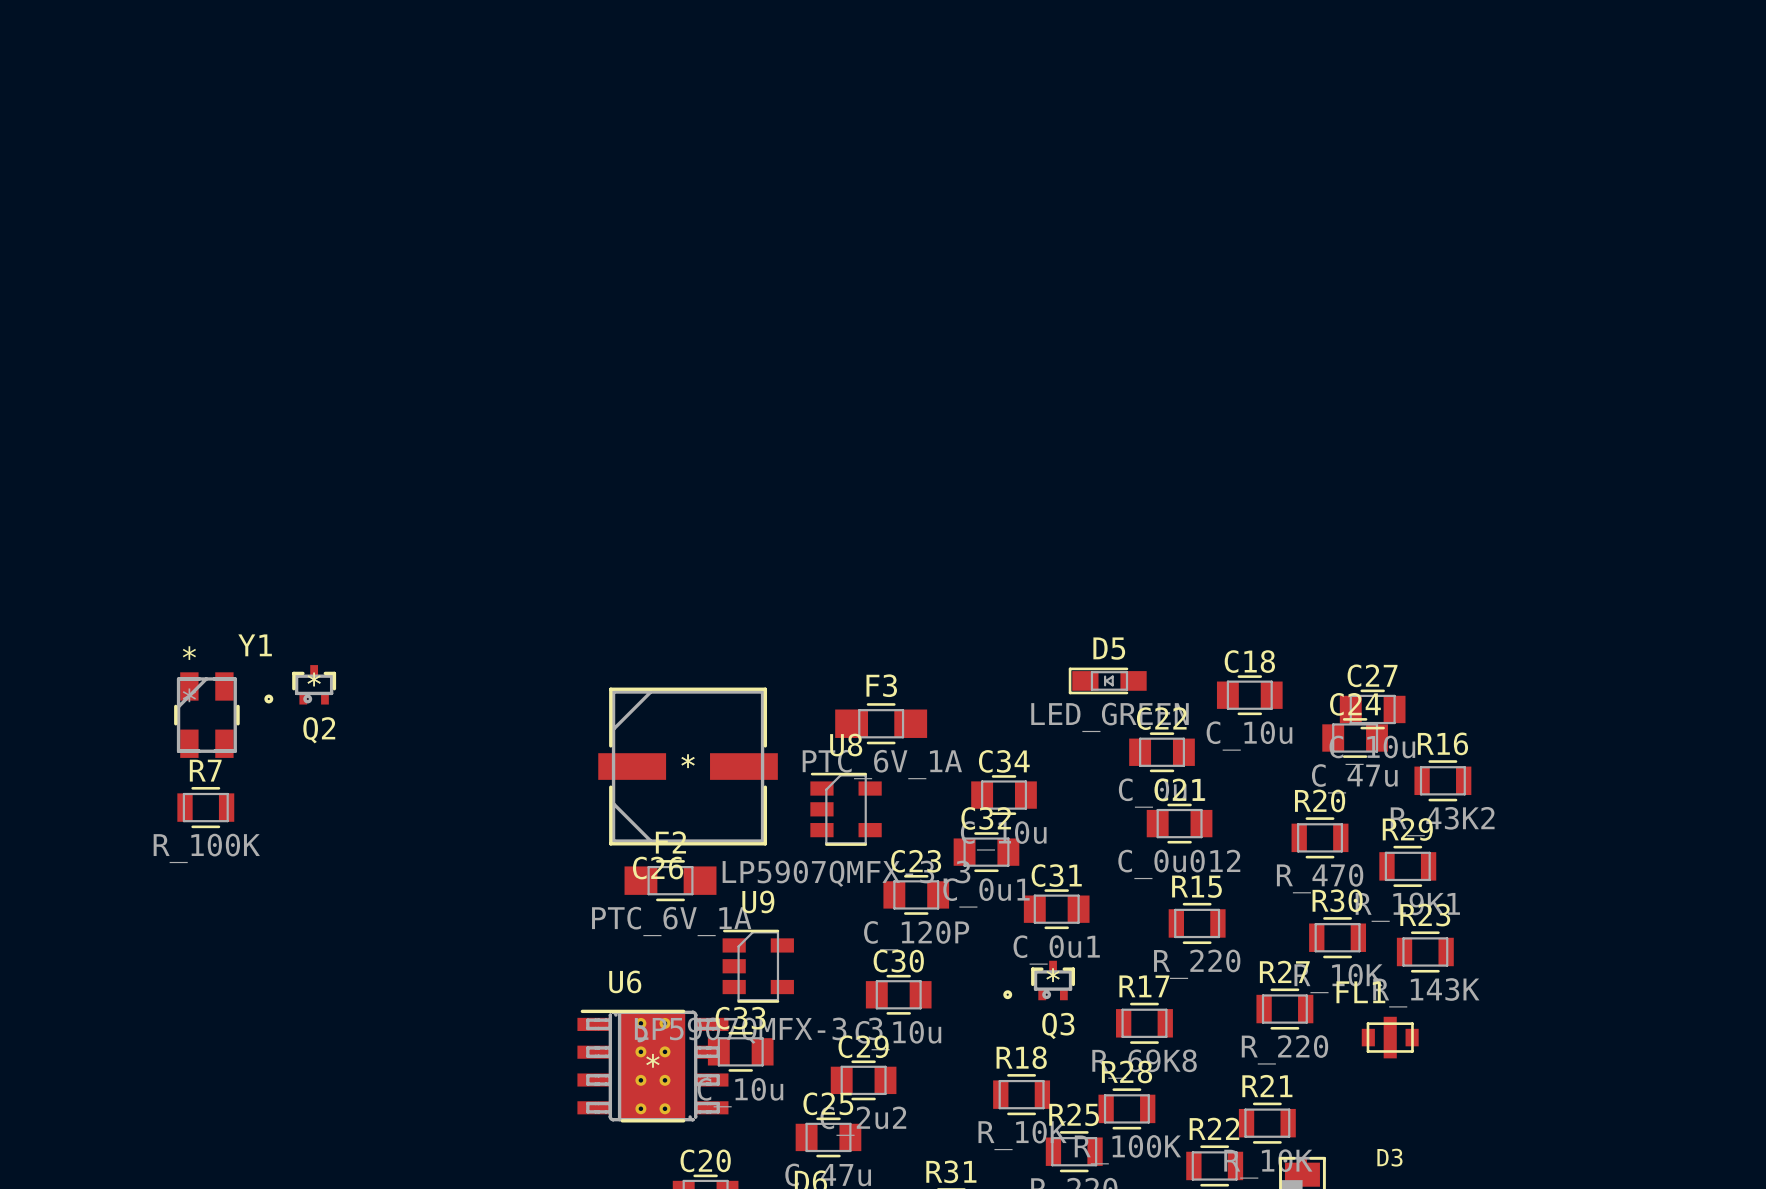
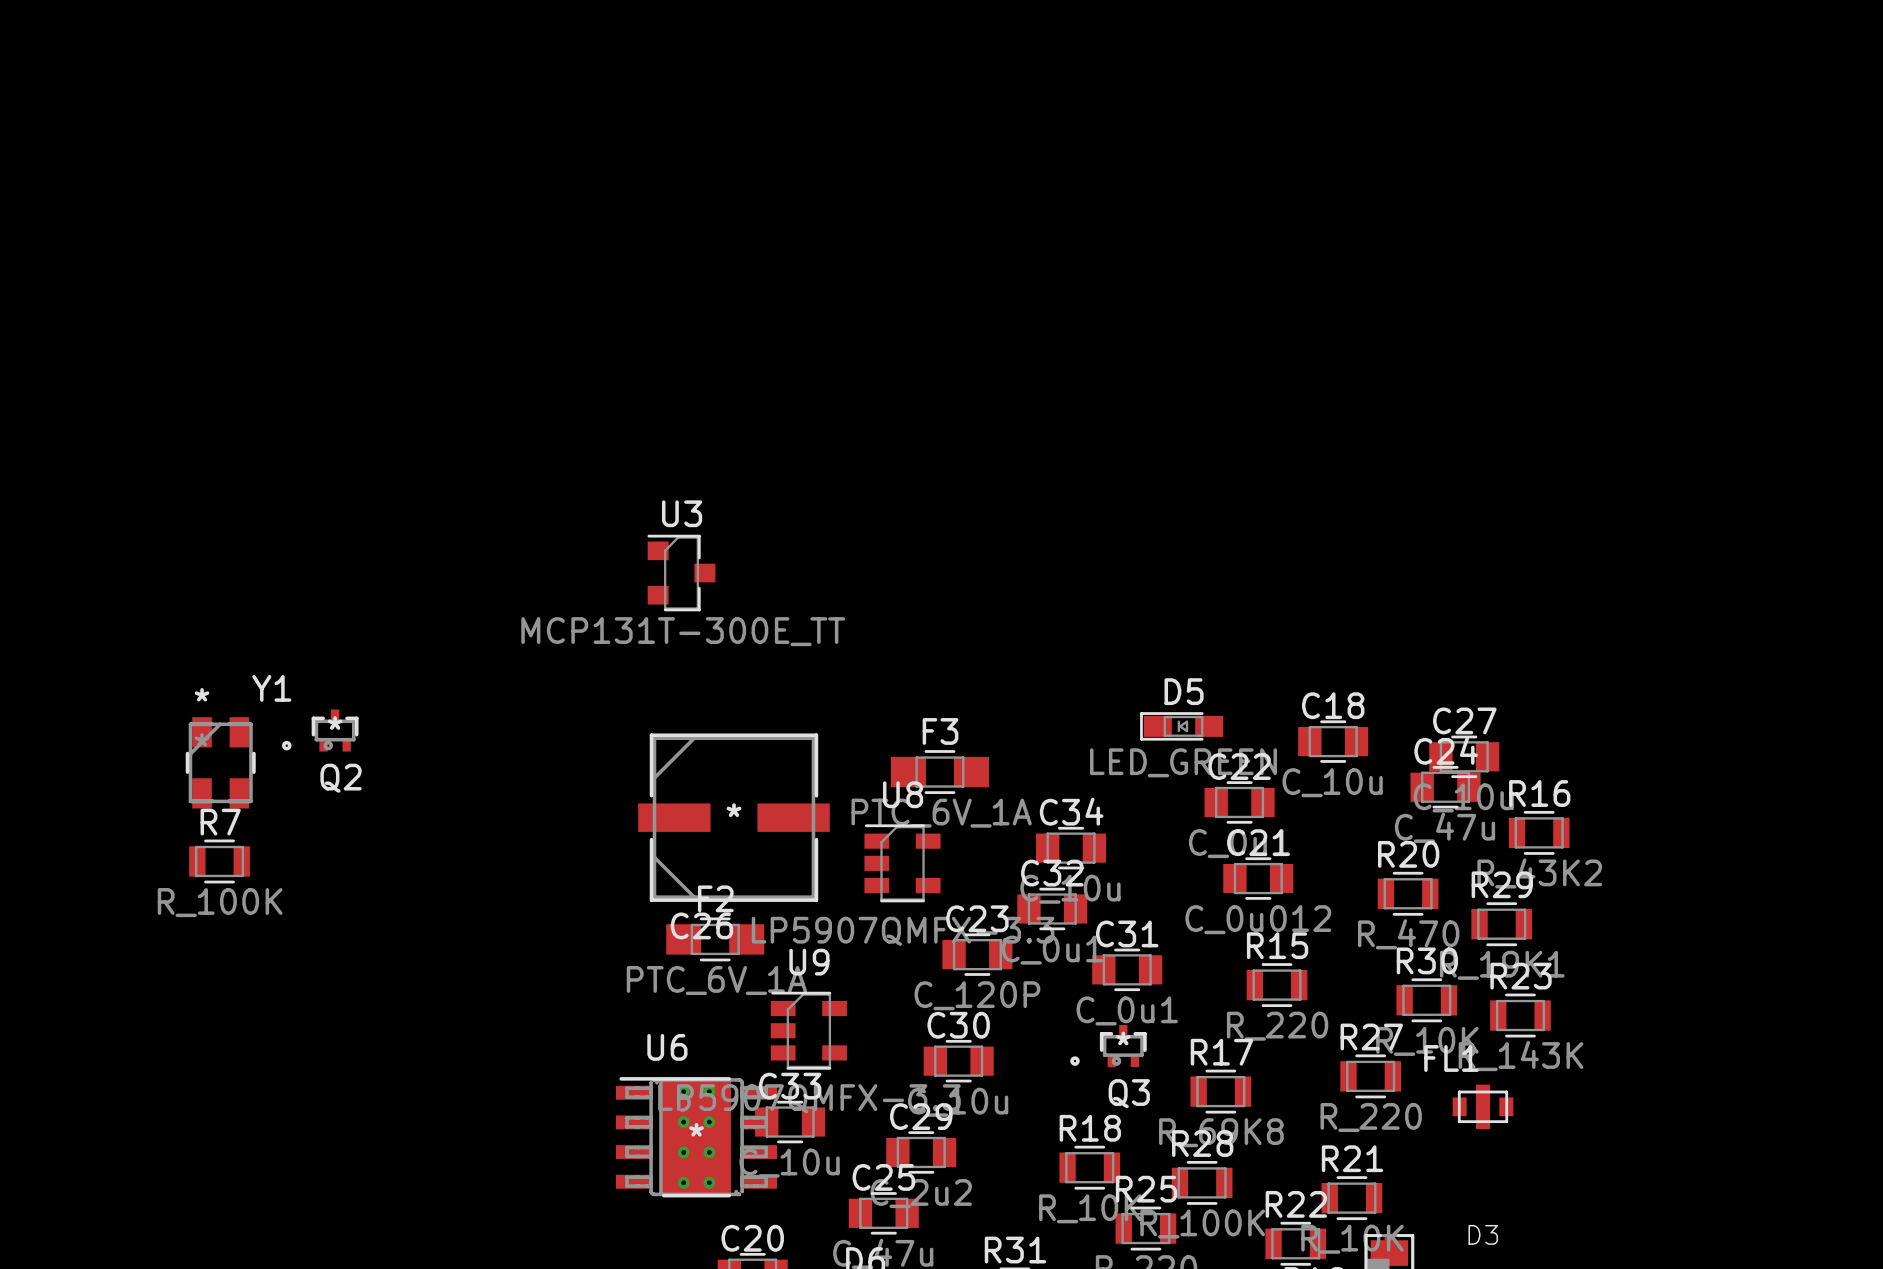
U3: none -> MCP131T-300E_TT (681, 573)

